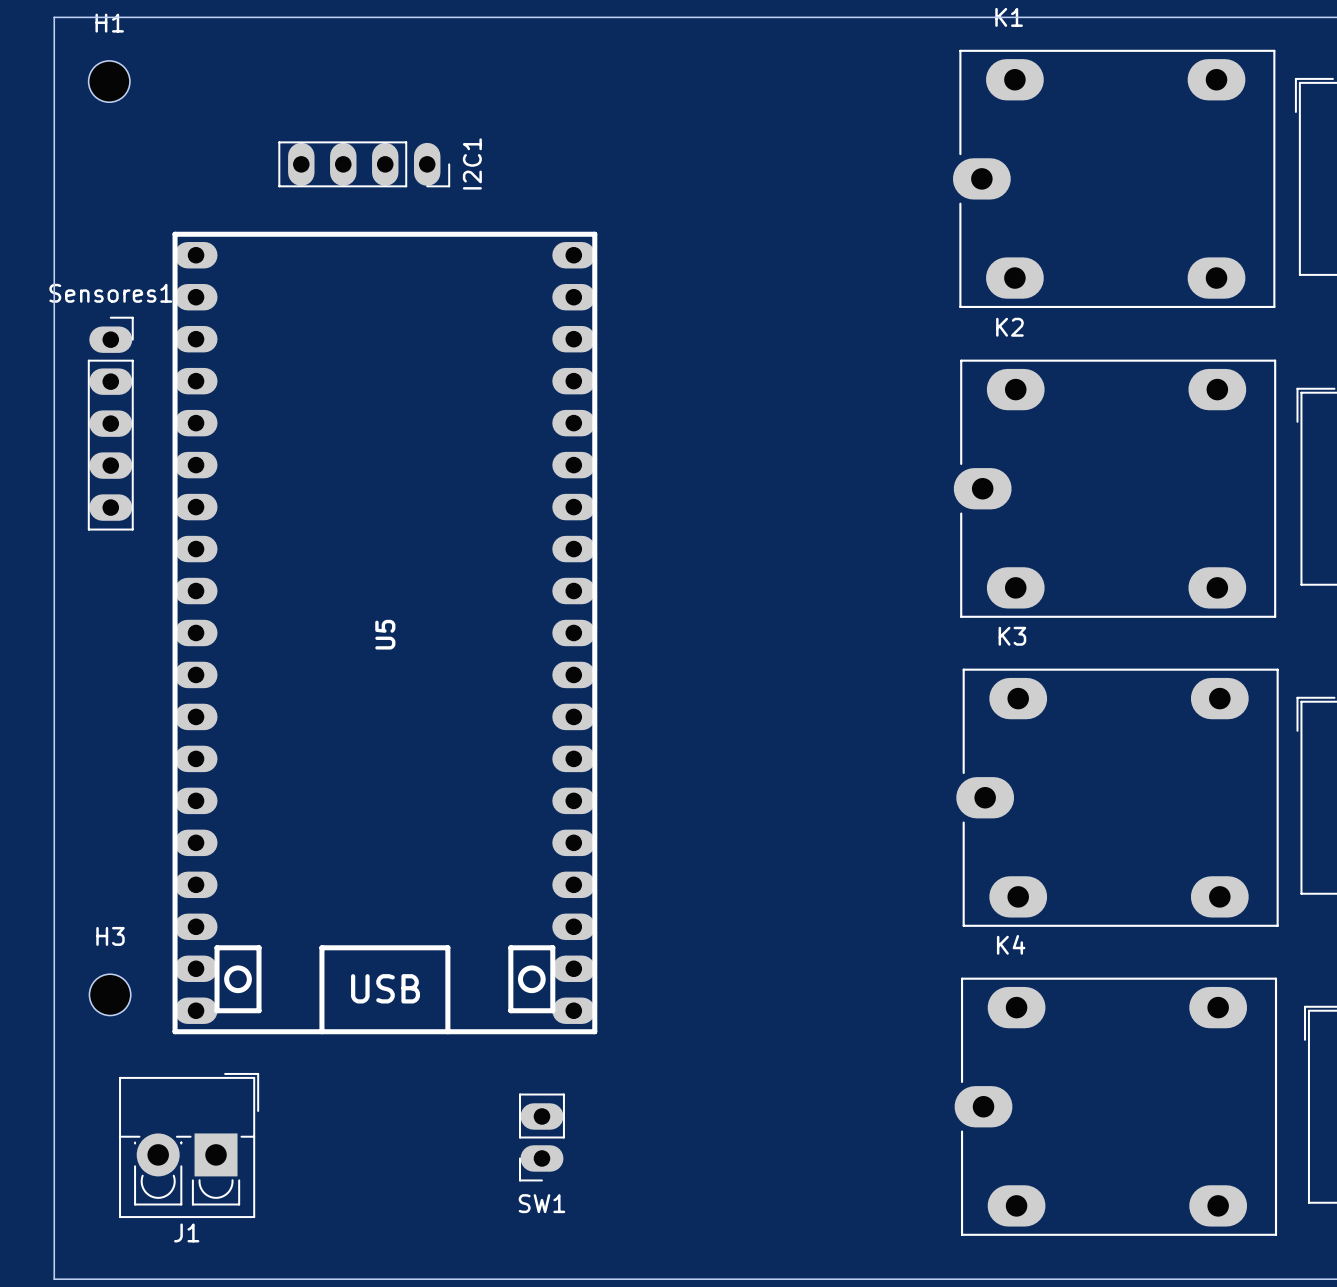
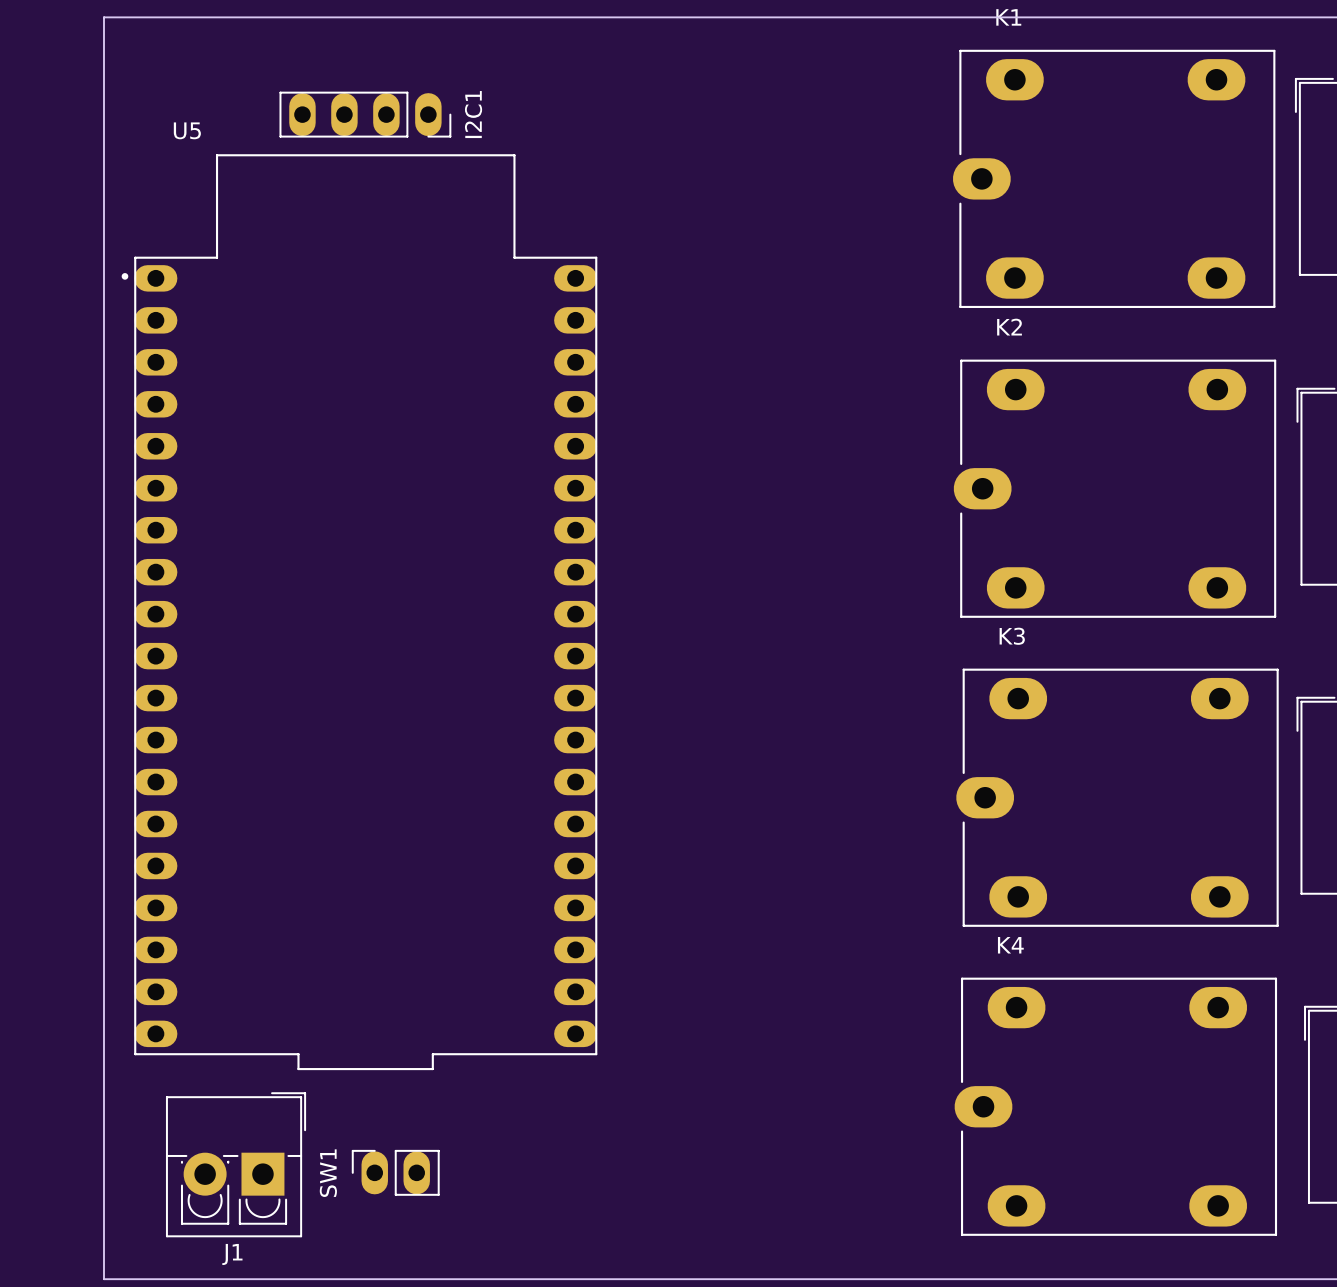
board edge: (103, 17) (54, 17) (54, 1279) (103, 1279) -> (103, 17) (103, 1279)
H1: (109, 81) -> none
I2C1 position: (364, 164) -> (365, 114)
U5 footprint: [172, 231, 598, 1035] -> [121, 154, 598, 1071]
Sensores1: (110, 423) -> none
U5 name position: U5 (385, 634) -> U5 (187, 130)
H3: (110, 994) -> none
SW1 rotation: 0° (541, 1137) -> 90° clockwise (395, 1172)
SW1 position: (541, 1137) -> (395, 1172)
J1 position: (189, 1145) -> (236, 1164)

